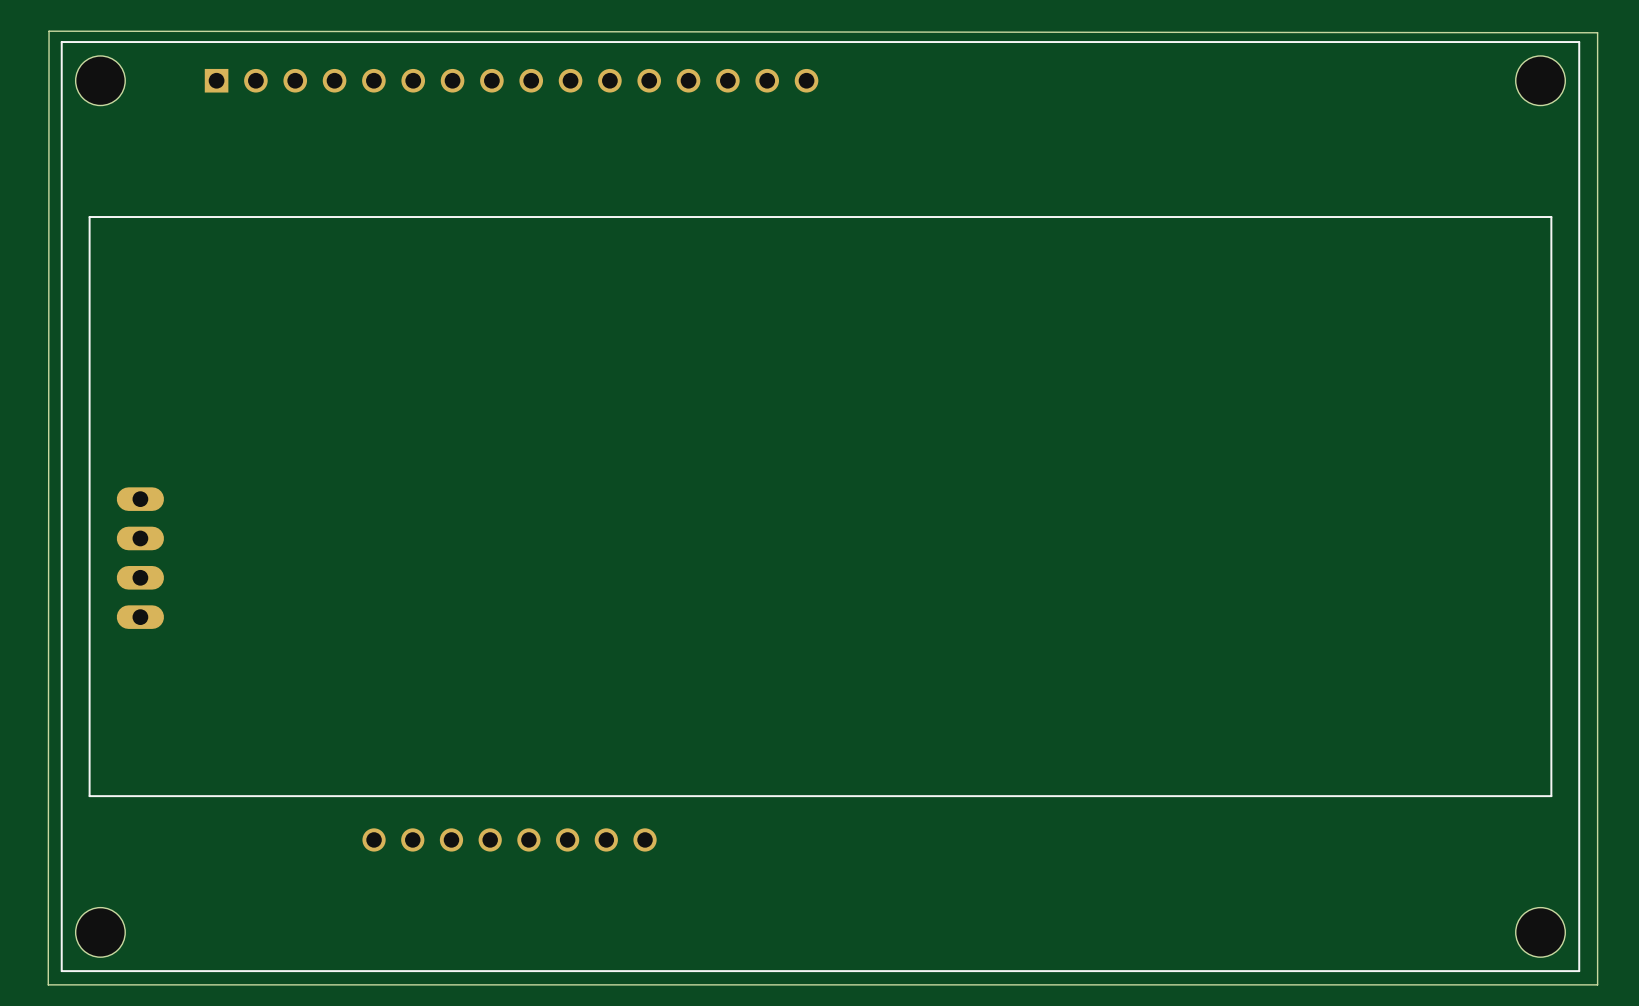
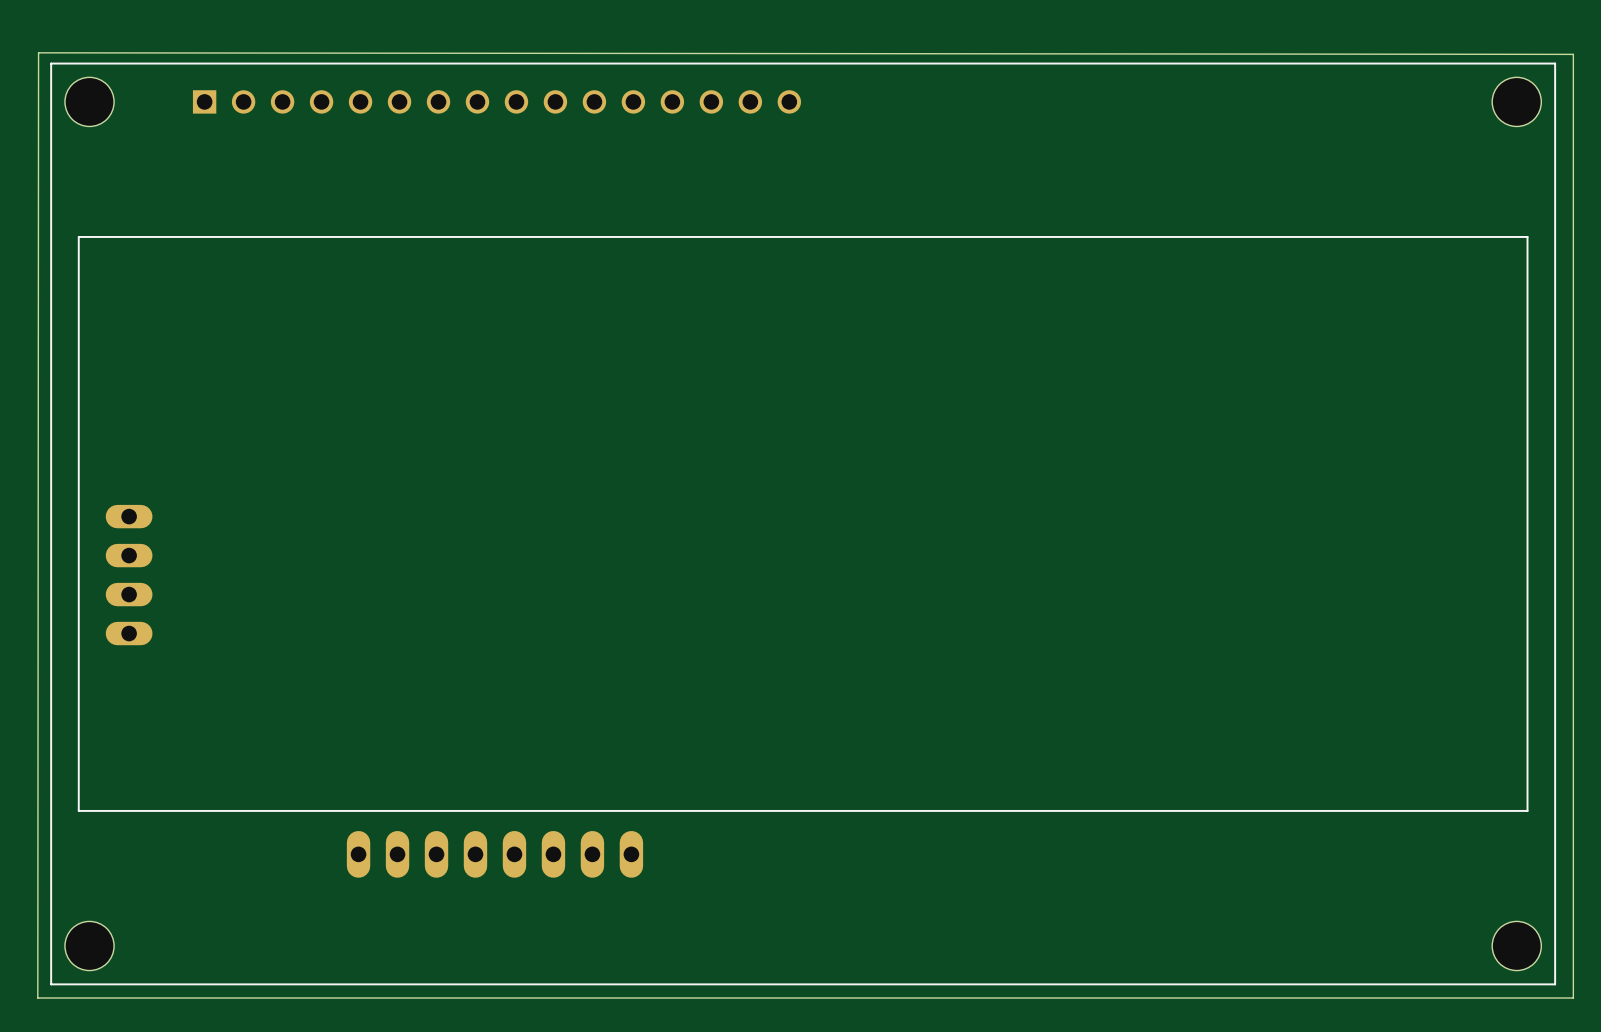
part footprint: [362, 828, 657, 852] -> [346, 830, 644, 878]

